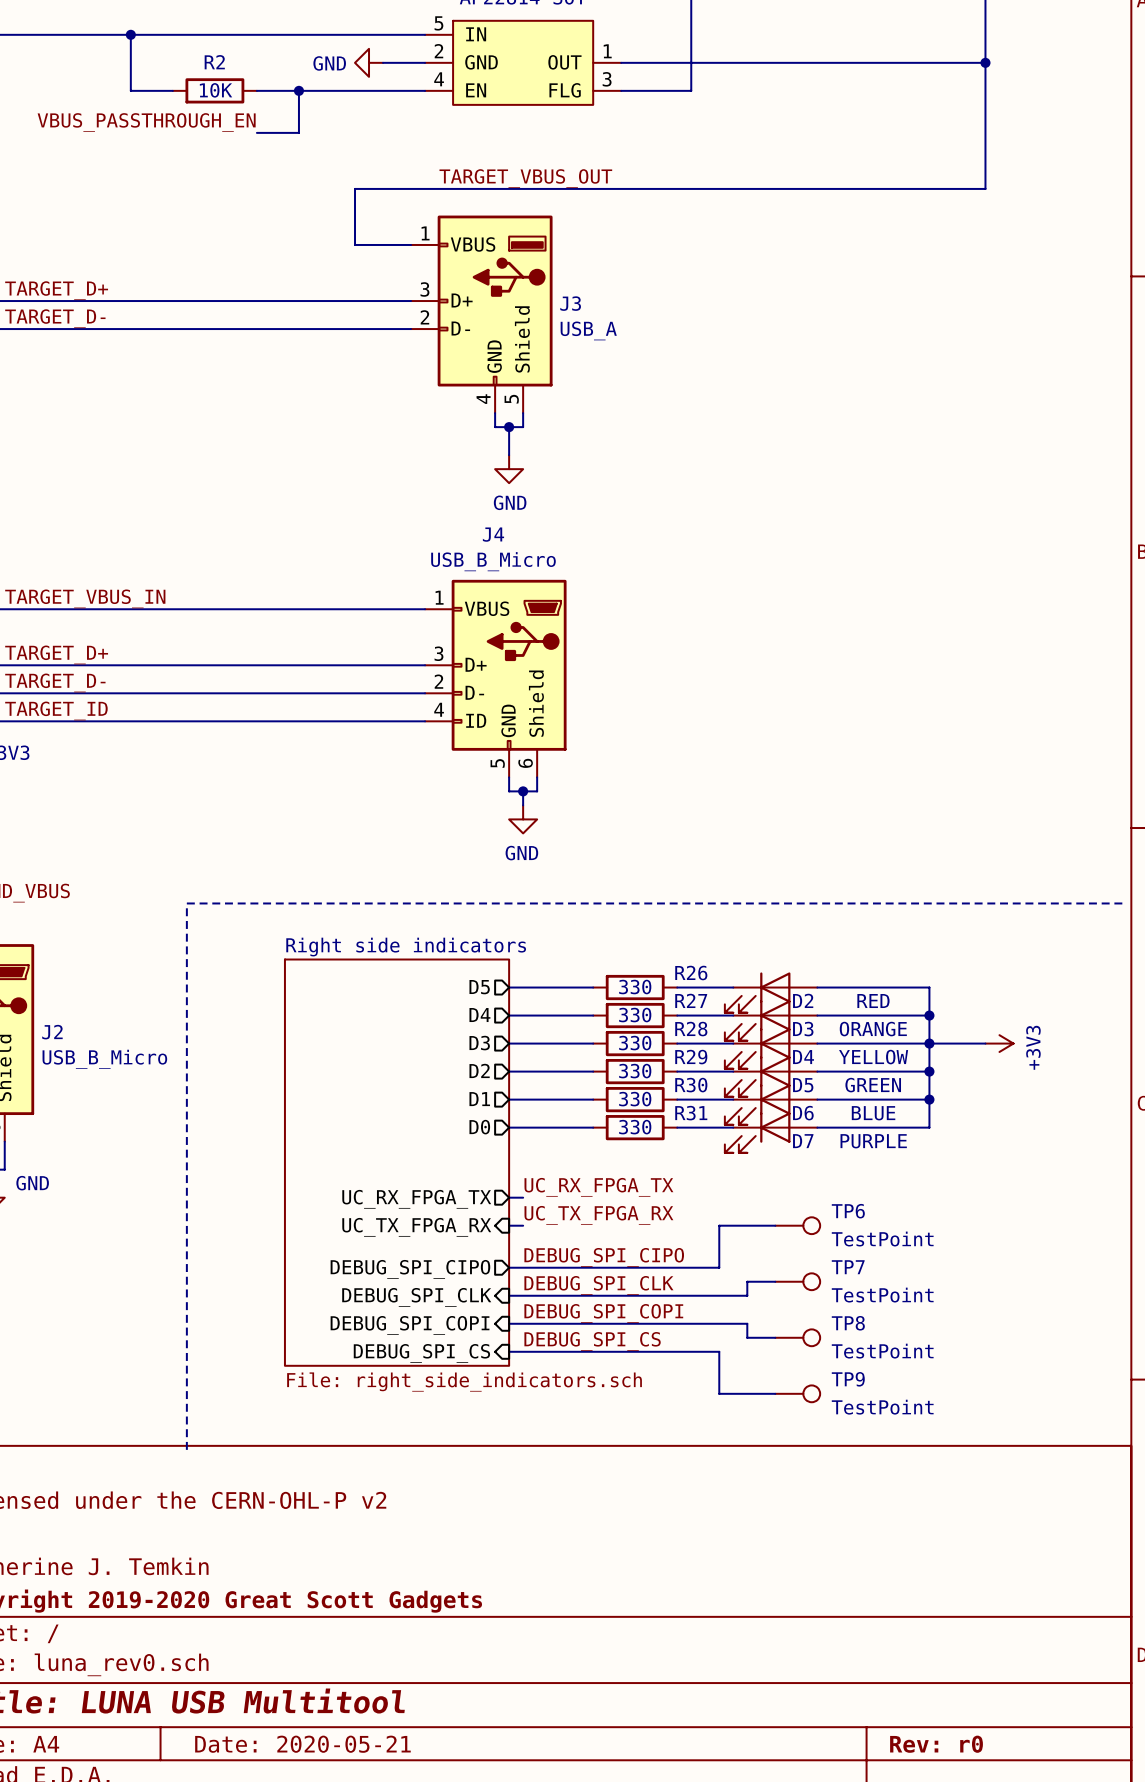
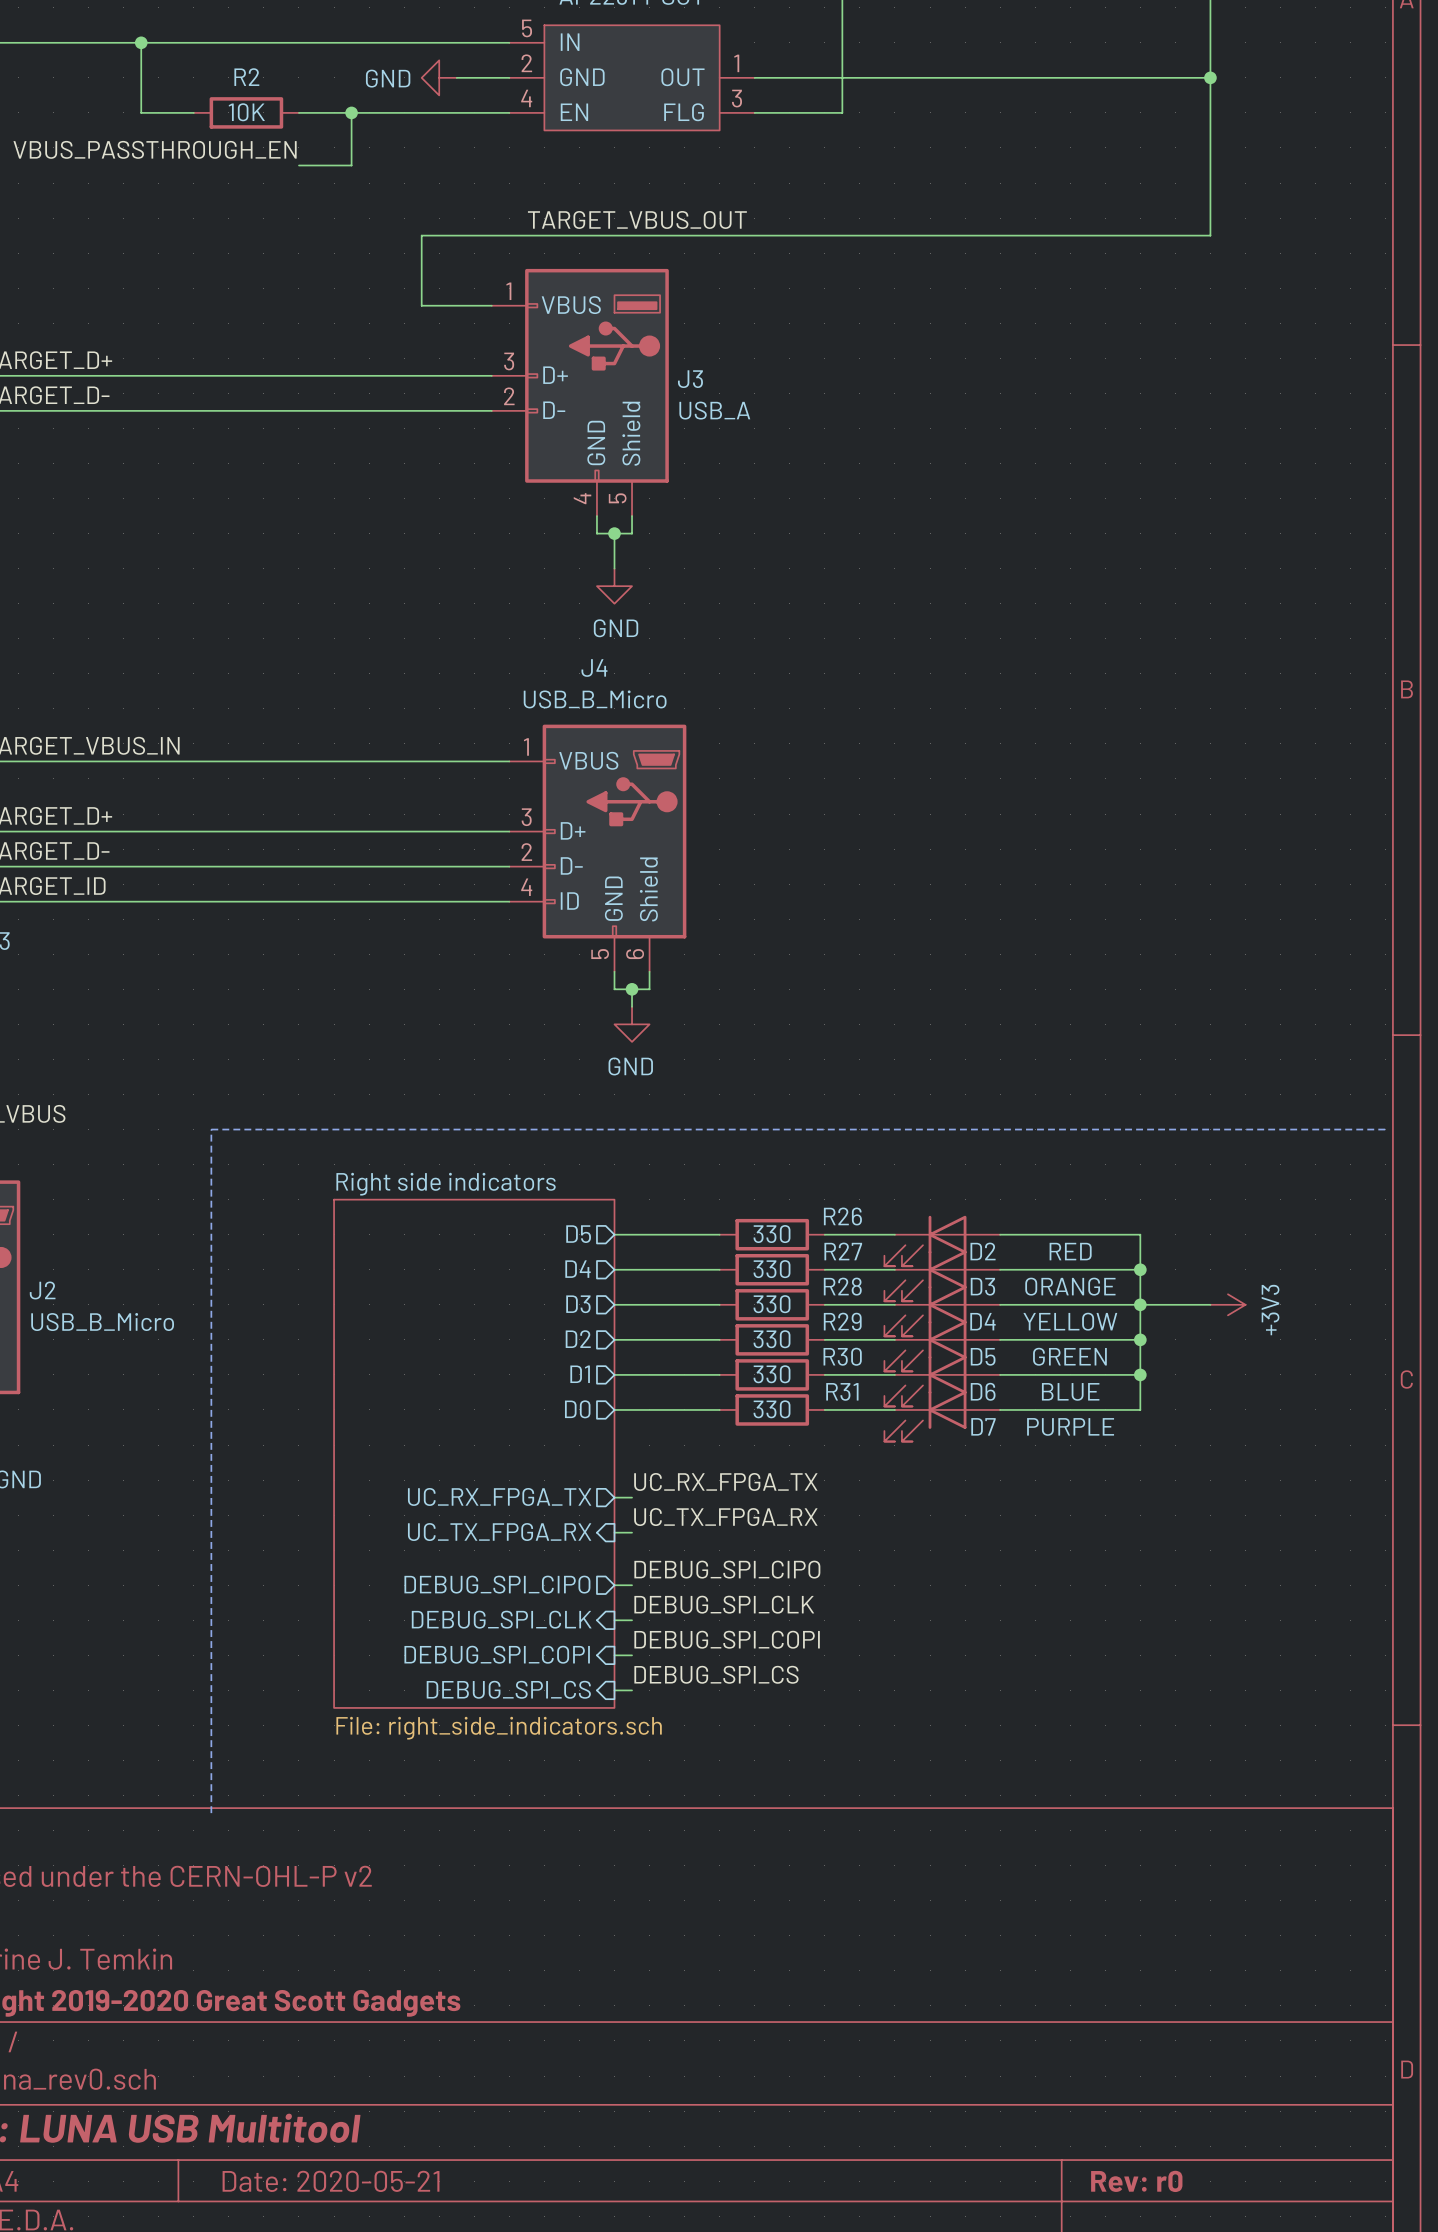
wire: (775, 1225) (719, 1225) (719, 1267) (523, 1267) -> none
TP6: TestPoint (797, 1225) -> none
wire: (775, 1281) (747, 1281) (747, 1295) (523, 1295) -> none
TP7: TestPoint (797, 1281) -> none
wire: (523, 1323) (747, 1323) (747, 1337) (775, 1337) -> none
TP8: TestPoint (797, 1337) -> none
wire: (523, 1351) (719, 1351) (719, 1393) (775, 1393) -> none
TP9: TestPoint (797, 1393) -> none

